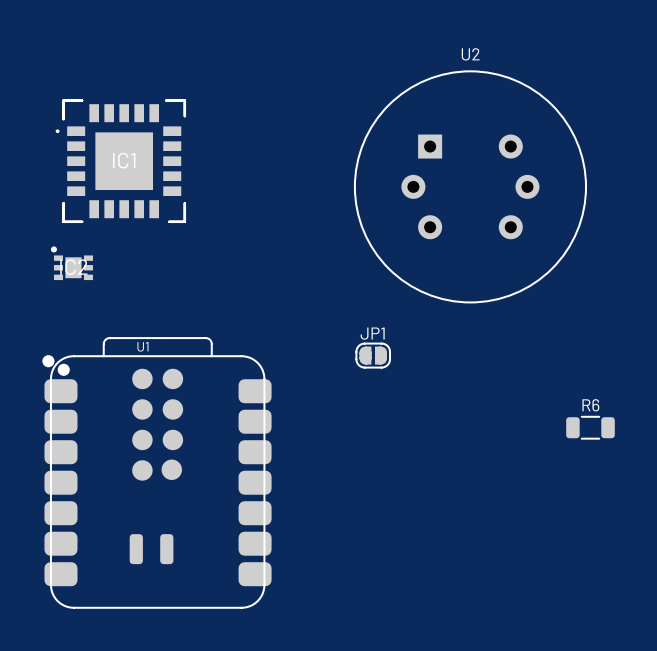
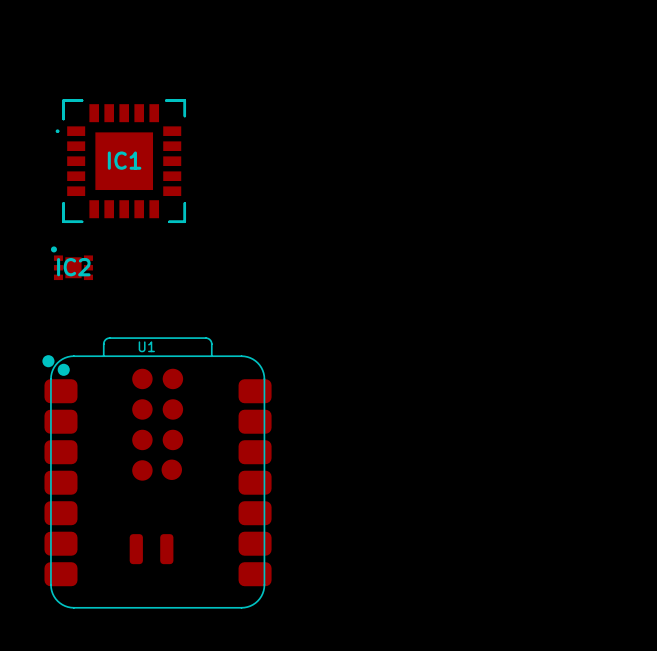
U2: (470, 186) -> none
JP1: (373, 355) -> none
R6: (590, 427) -> none

